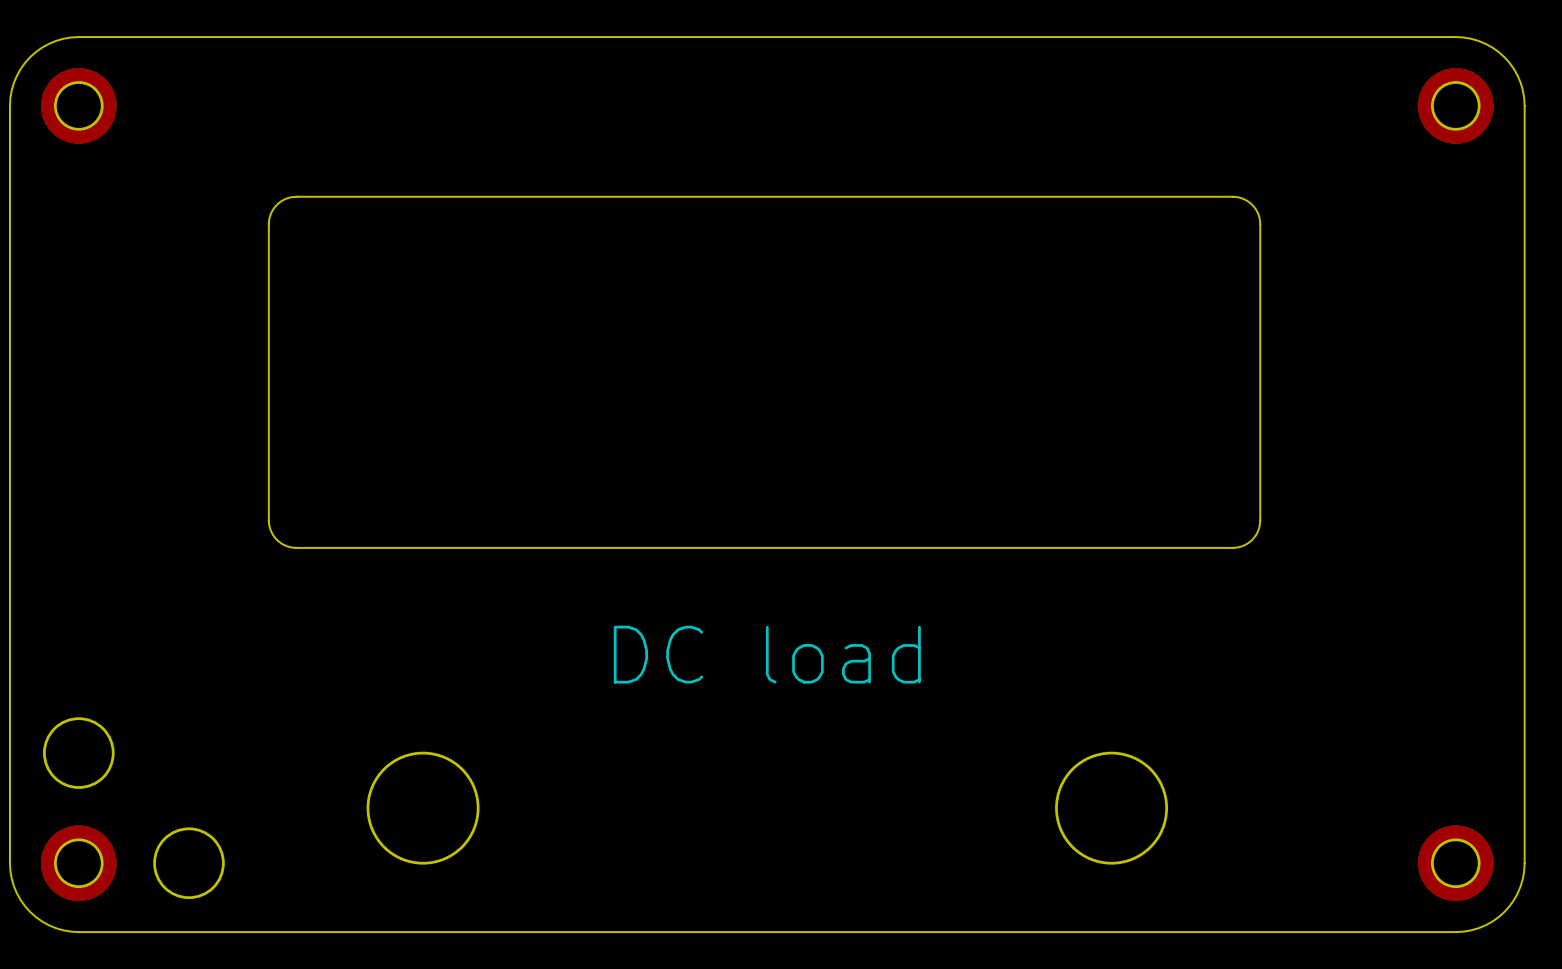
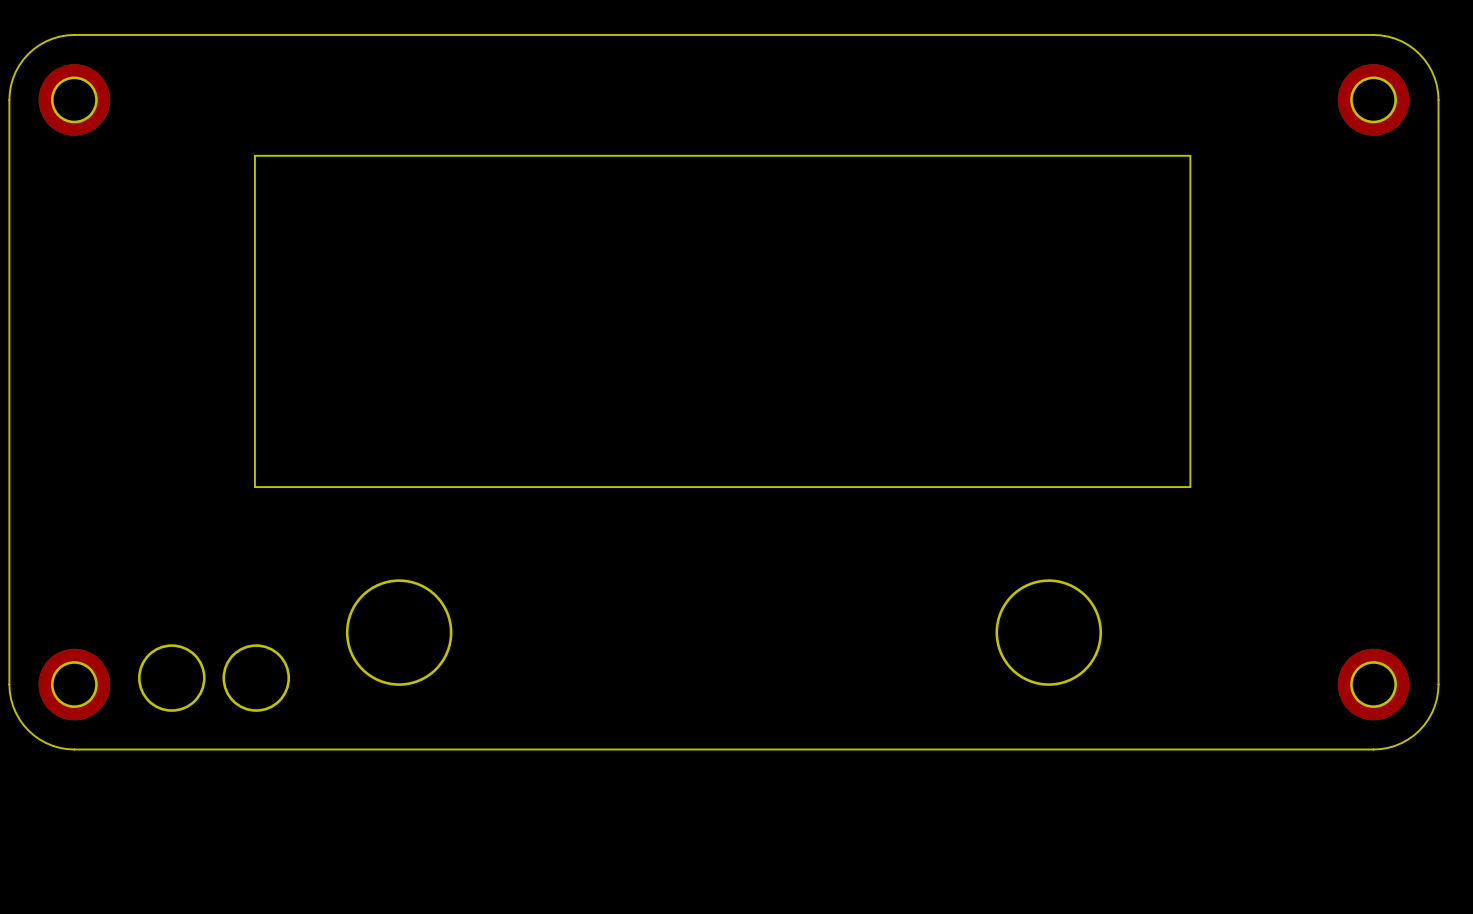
board edge: (296, 196) (1232, 196) (1241, 198) (1254, 207) (1258, 215) (1260, 224) (1258, 529) (1249, 541) (1241, 546) (1232, 547) (296, 547) (287, 546) (274, 537) (269, 523) (268, 224) (270, 215) (276, 204) (287, 198) (296, 196) -> (254, 155) (254, 487) (1190, 487) (1190, 155) (254, 155)
text: DC load (767, 654) -> none
round board edge: none -> [138, 644, 206, 712]
round board edge: none -> [222, 644, 291, 712]
round board edge: [43, 717, 115, 789] -> none
board edge: (9, 725) (9, 863) (13, 885) (24, 906) (35, 917) (56, 928) (78, 932) (1463, 931) (1478, 928) (1498, 917) (1509, 906) (1520, 885) (1524, 863) (1524, 725) -> (9, 684) (11, 699) (15, 712) (28, 730) (46, 743) (59, 747) (74, 749) (1373, 749) (1388, 747) (1401, 743) (1419, 730) (1428, 719) (1434, 706) (1438, 684)
round board edge position: (423, 808) -> (399, 632)
round board edge position: (1111, 808) -> (1048, 632)
round board edge: [153, 827, 225, 900] -> none
part position: (78, 863) -> (74, 684)
part position: (1455, 863) -> (1373, 684)

